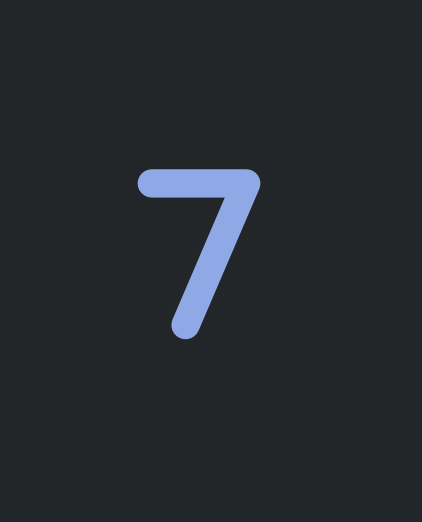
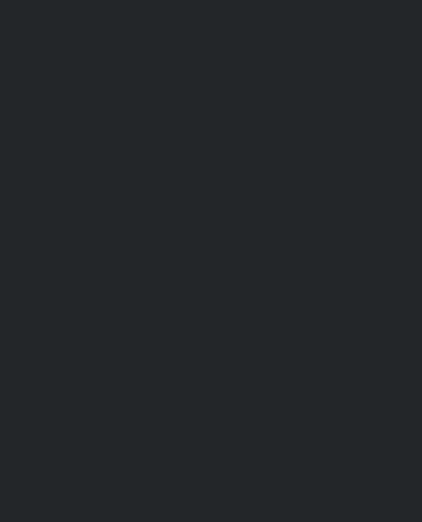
text: 7 (199, 254) -> none

